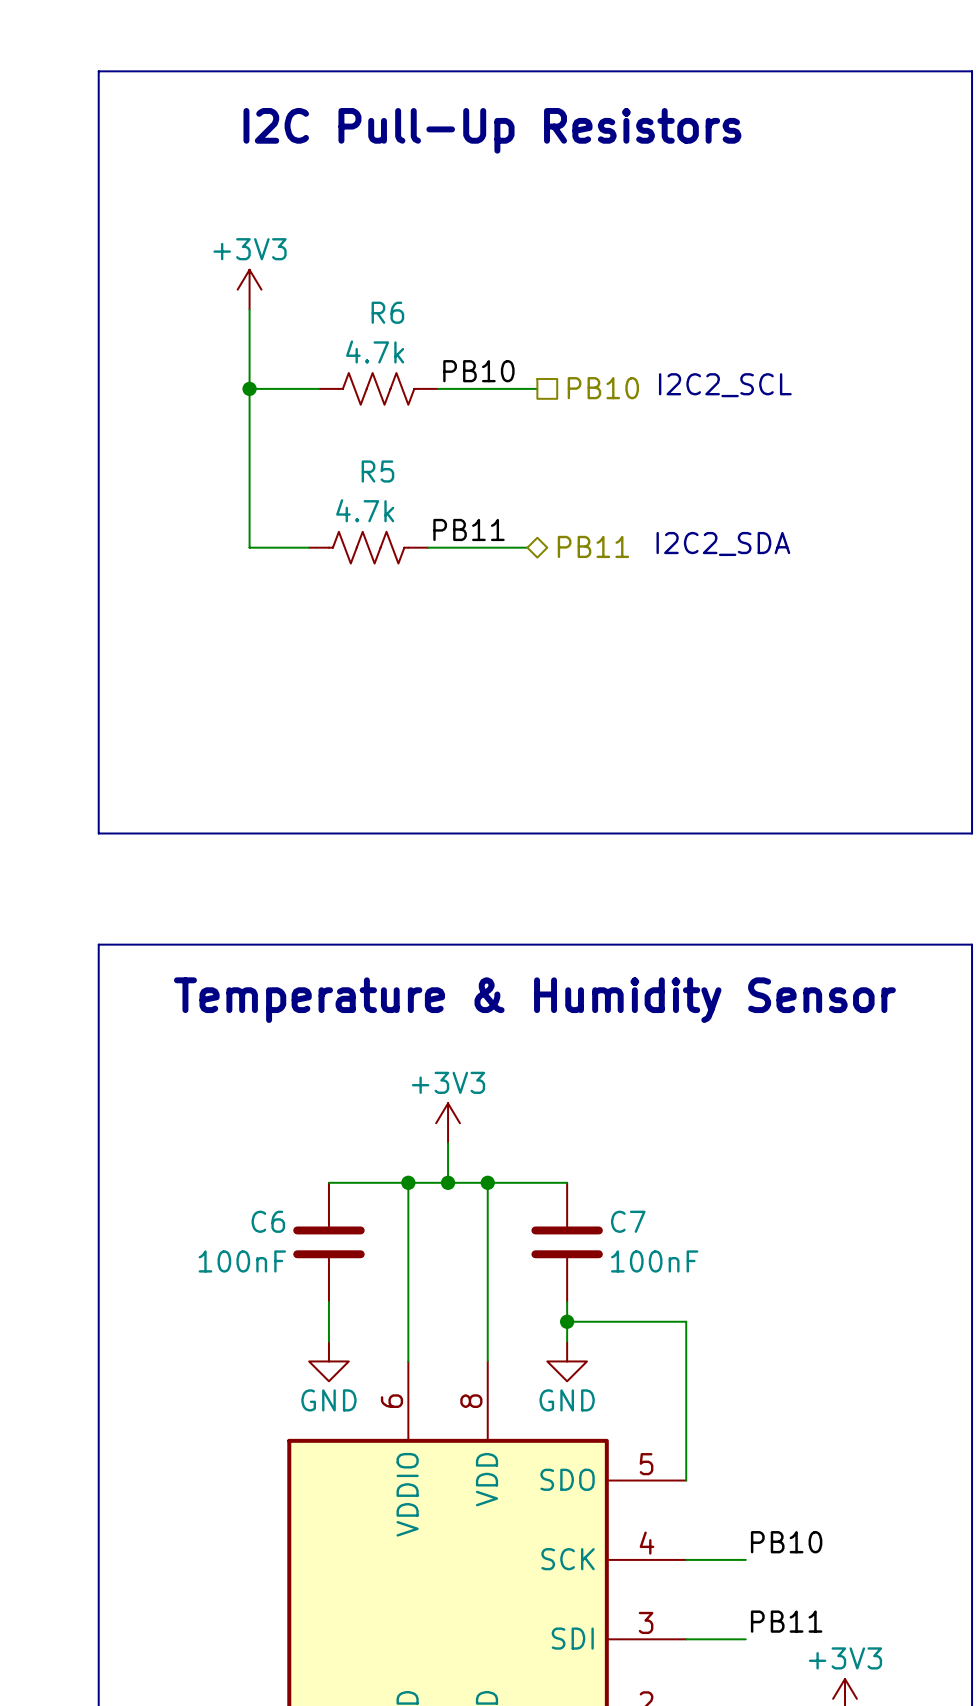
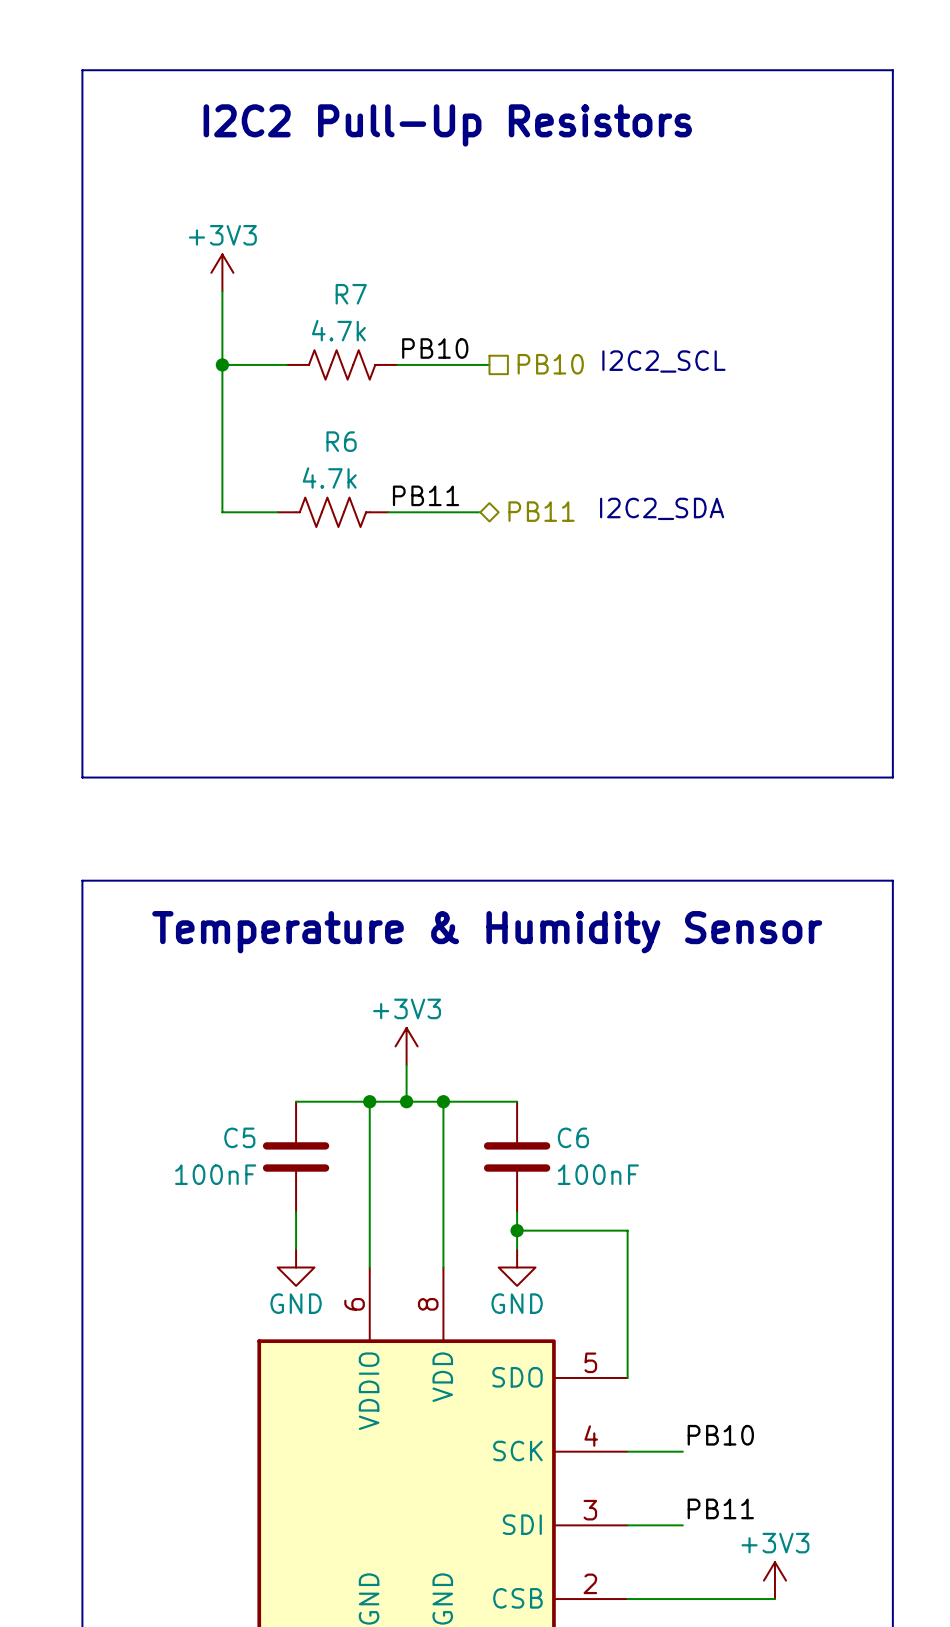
text: I2C Pull-Up Resistors (492, 130) -> I2C2 Pull-Up Resistors (447, 125)
R6 name: R6 (387, 312) -> R7 (351, 294)
R5 name: R5 (377, 471) -> R6 (341, 441)
C6 name: C6 (268, 1221) -> C5 (239, 1137)
C7 name: C7 (628, 1221) -> C6 (573, 1137)

